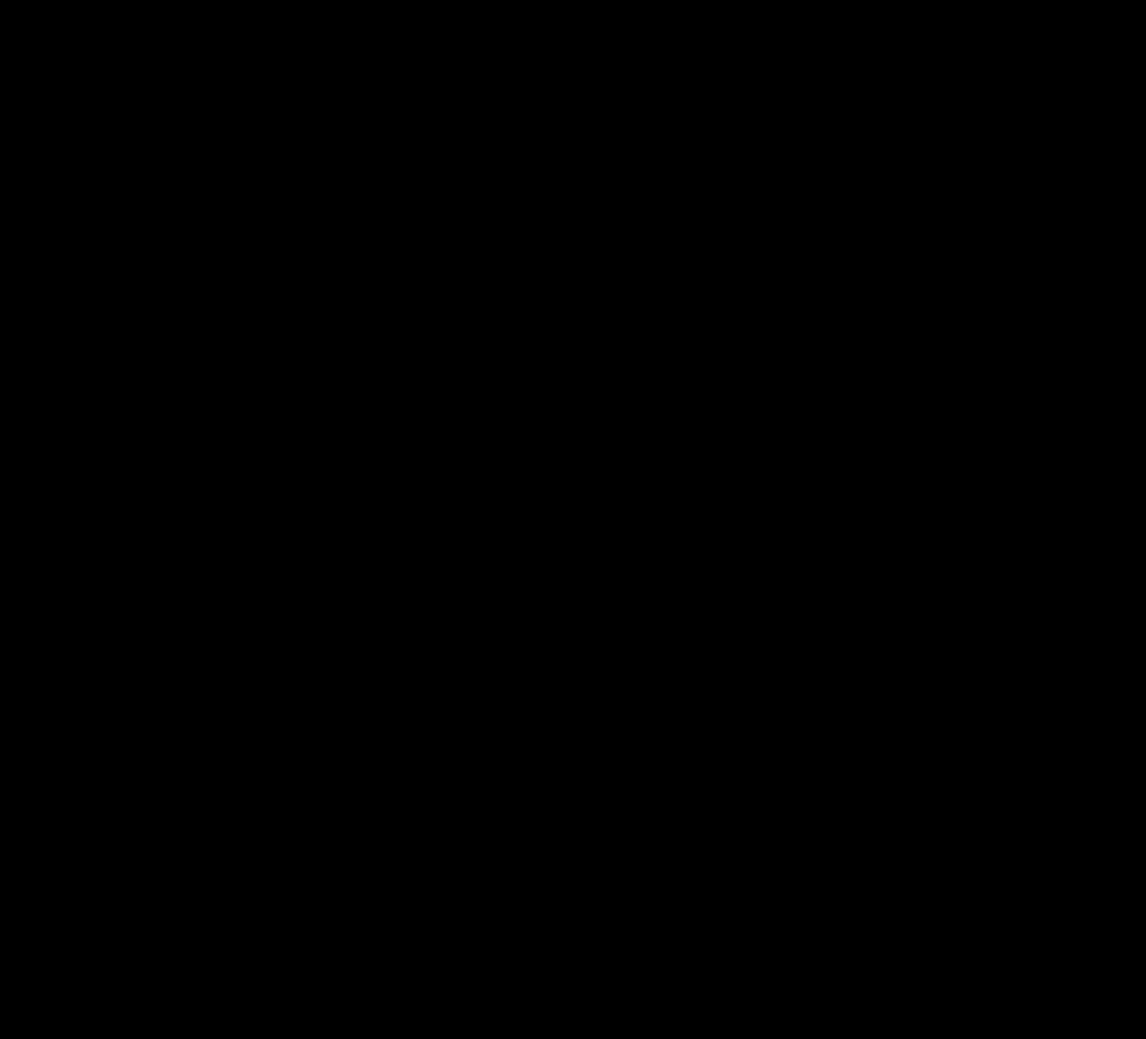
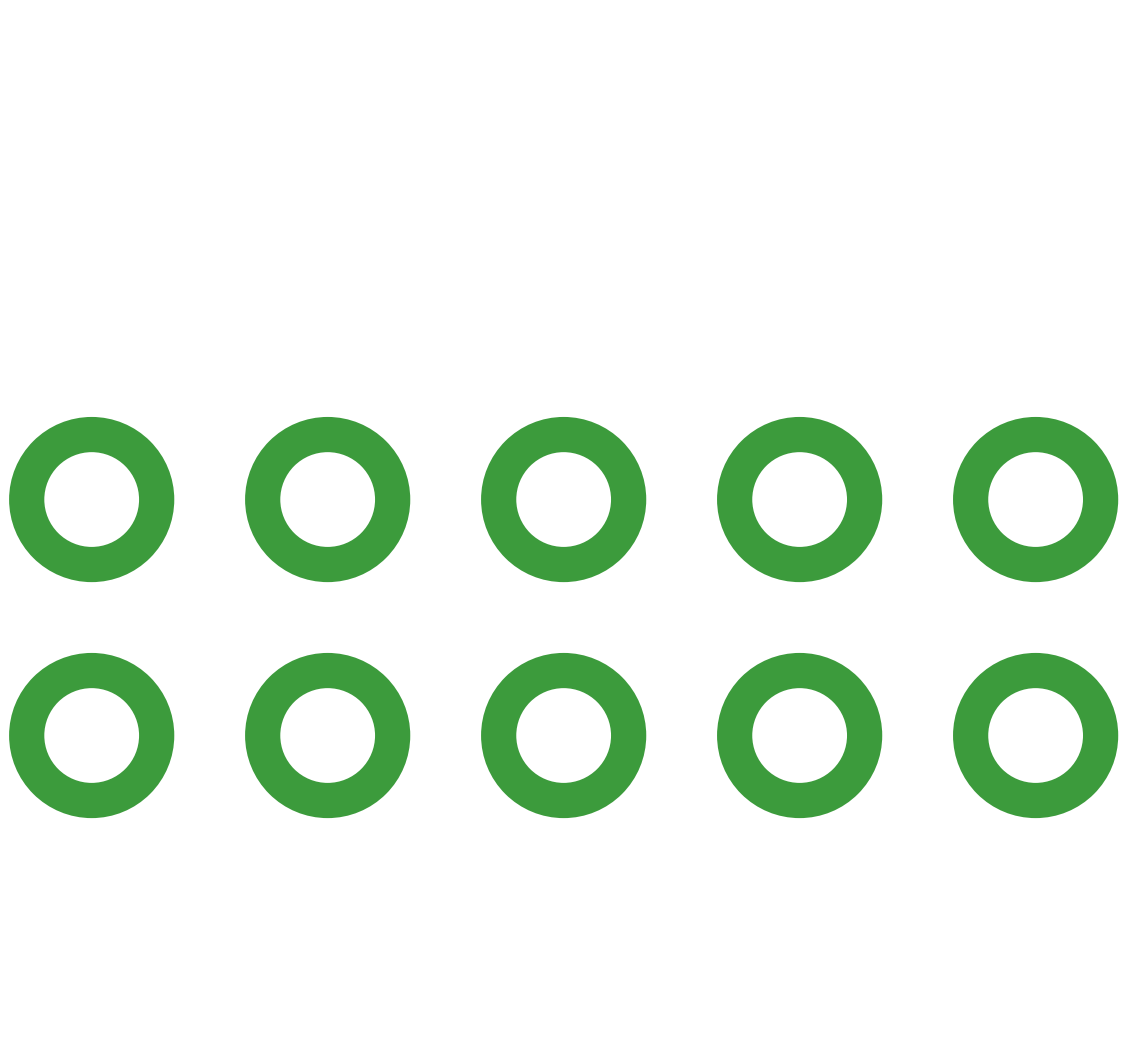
part: none -> (563, 617)

